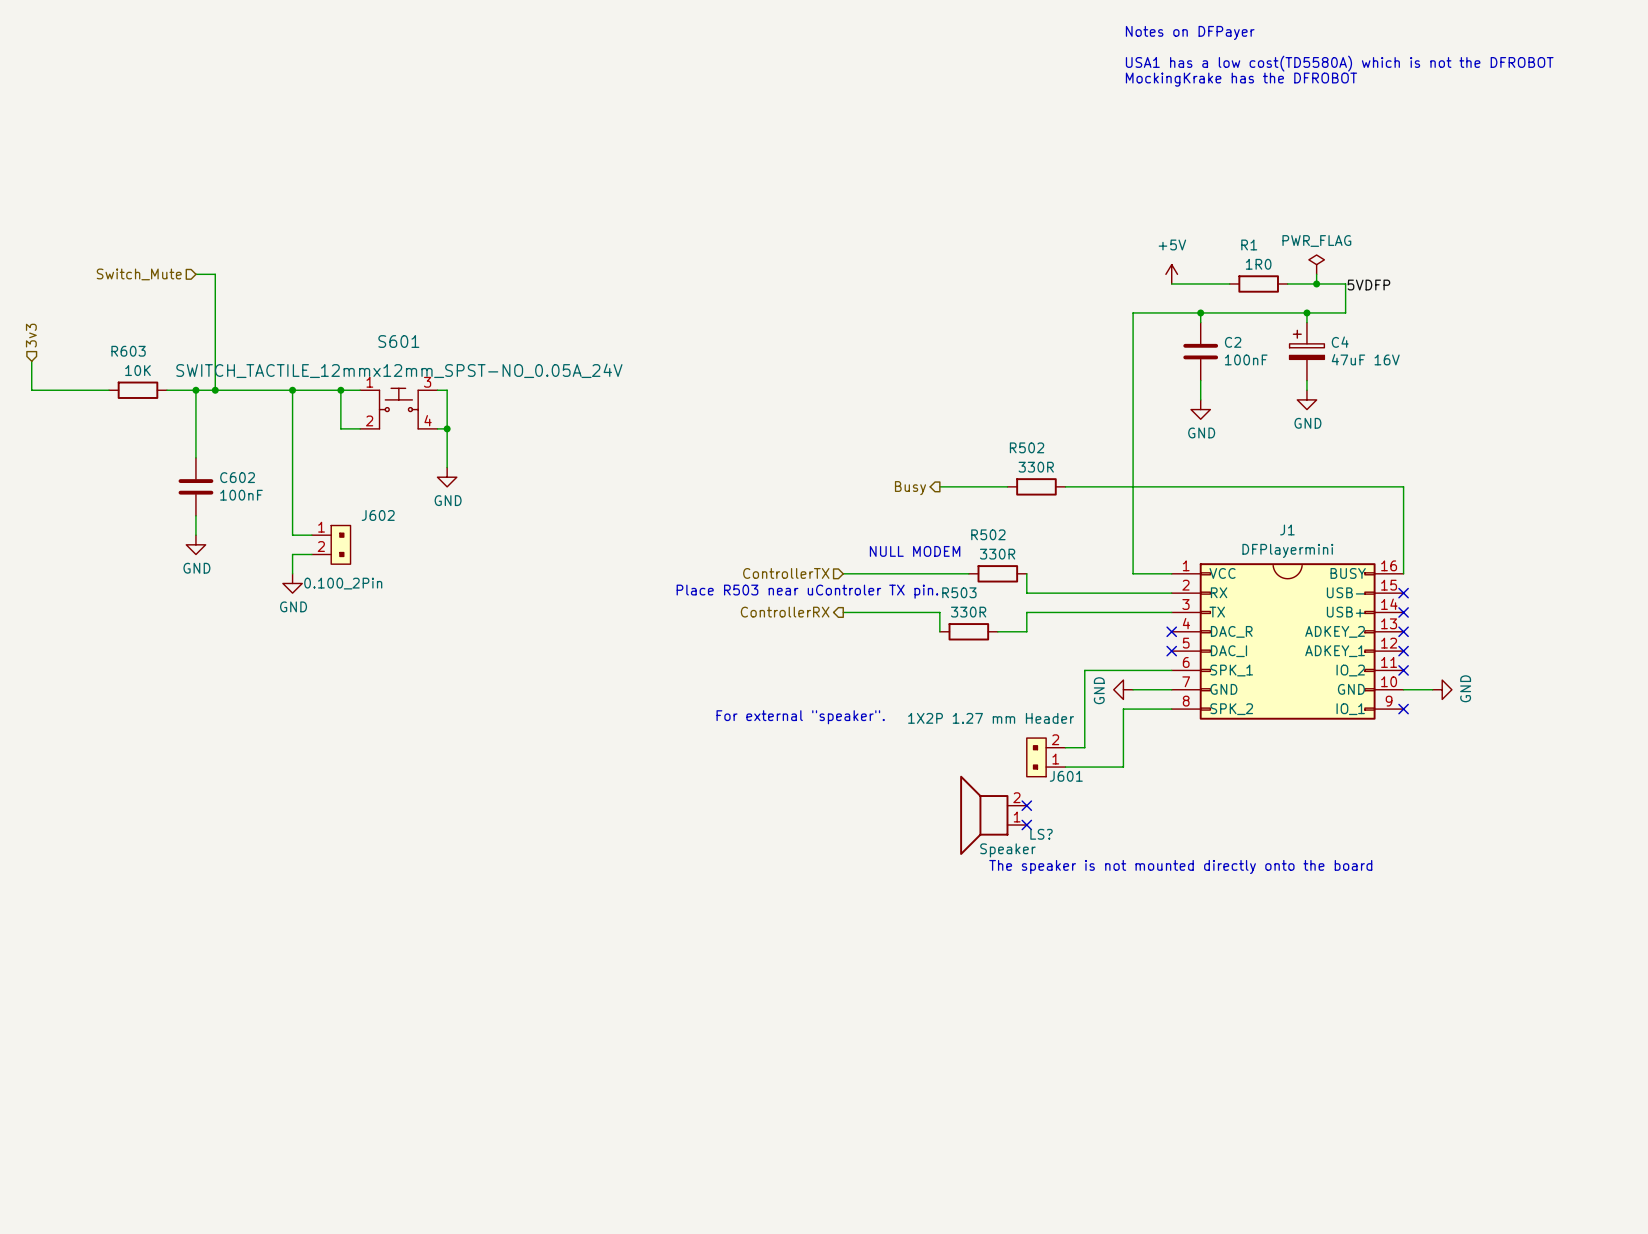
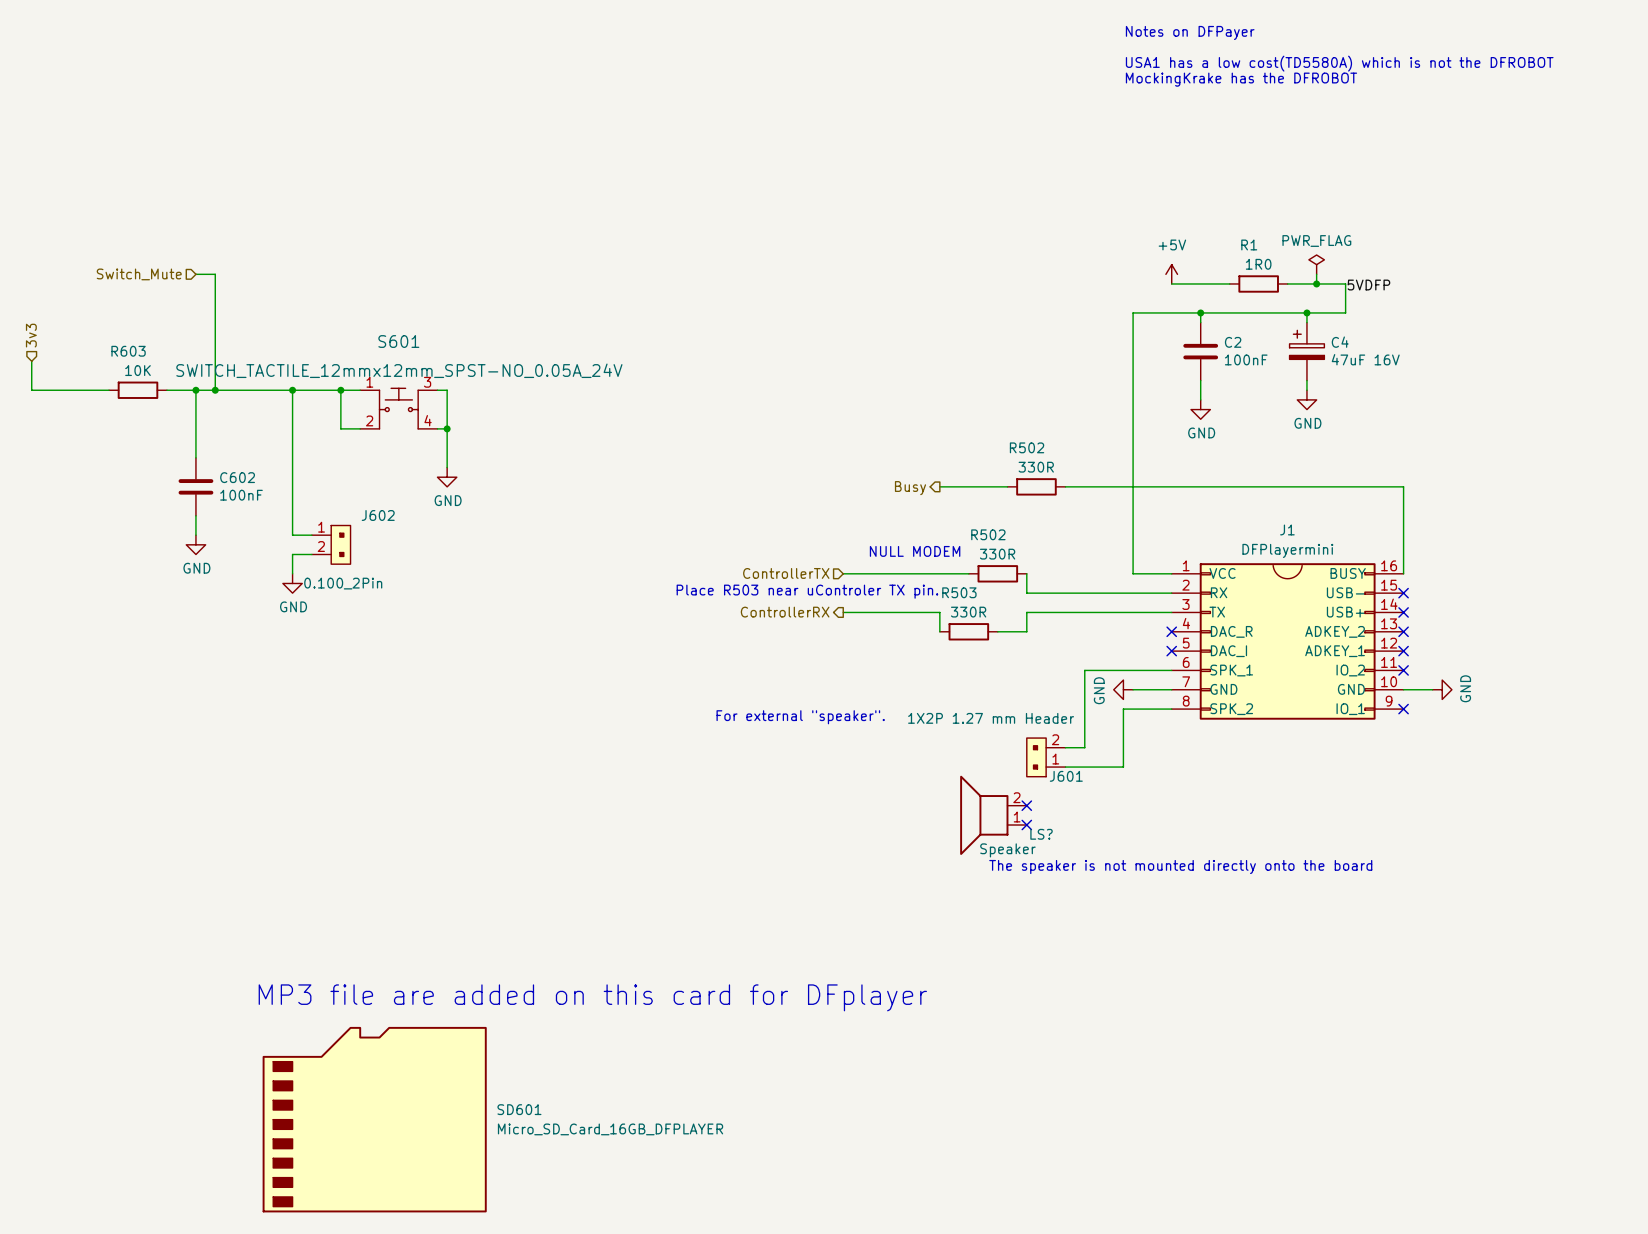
text: none -> MP3 file are added on this card for DFplayer (592, 997)
SD601: none -> Micro_SD_Card_16GB_DFPLAYER (374, 1119)

